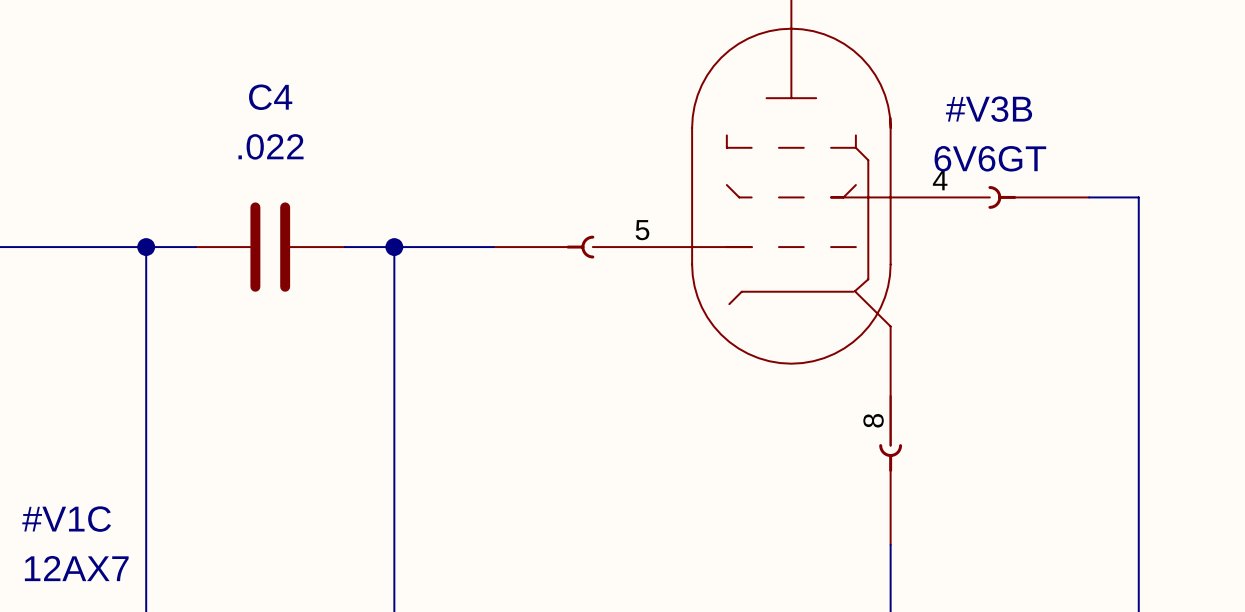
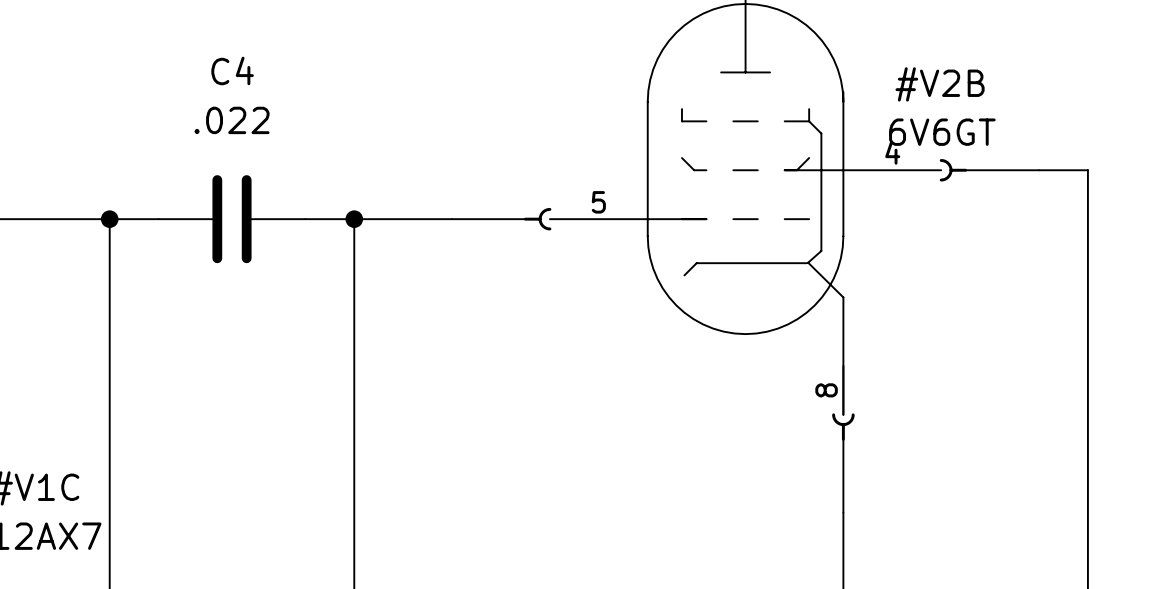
#V3B name: #V3B (989, 109) -> #V2B (940, 84)

